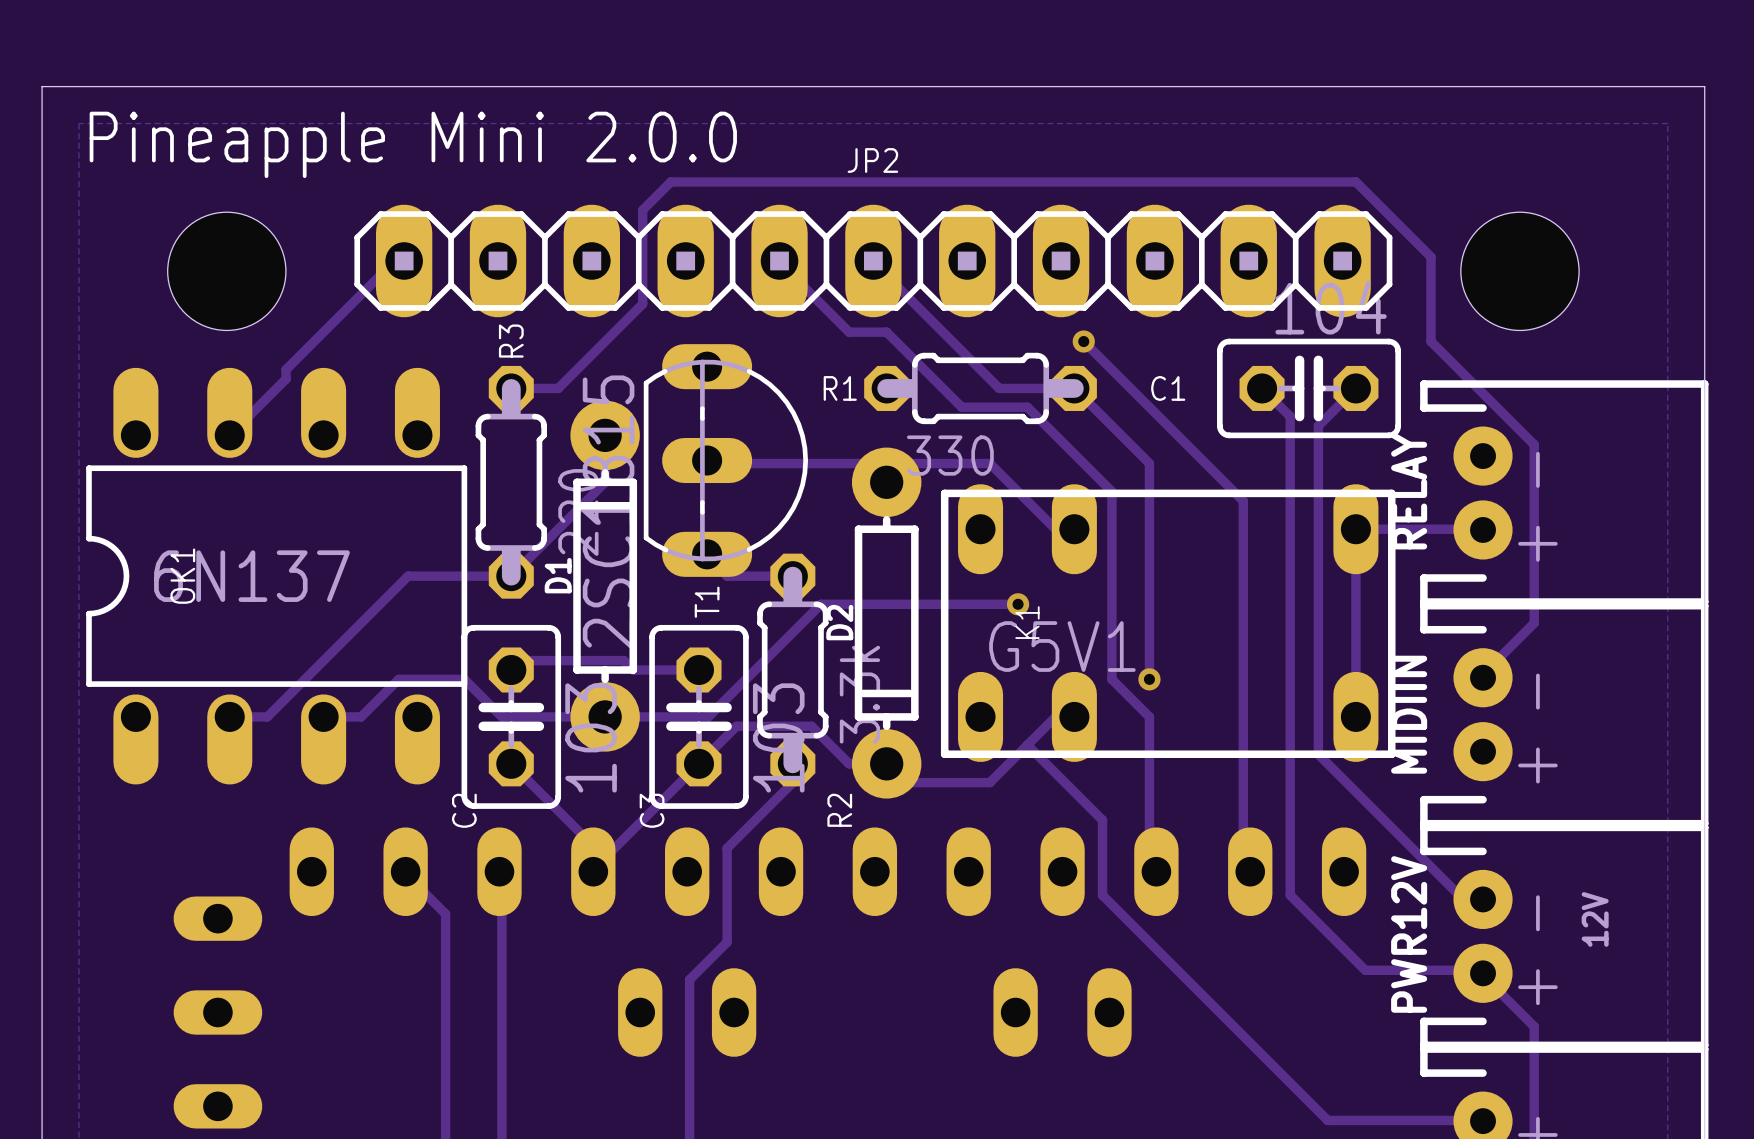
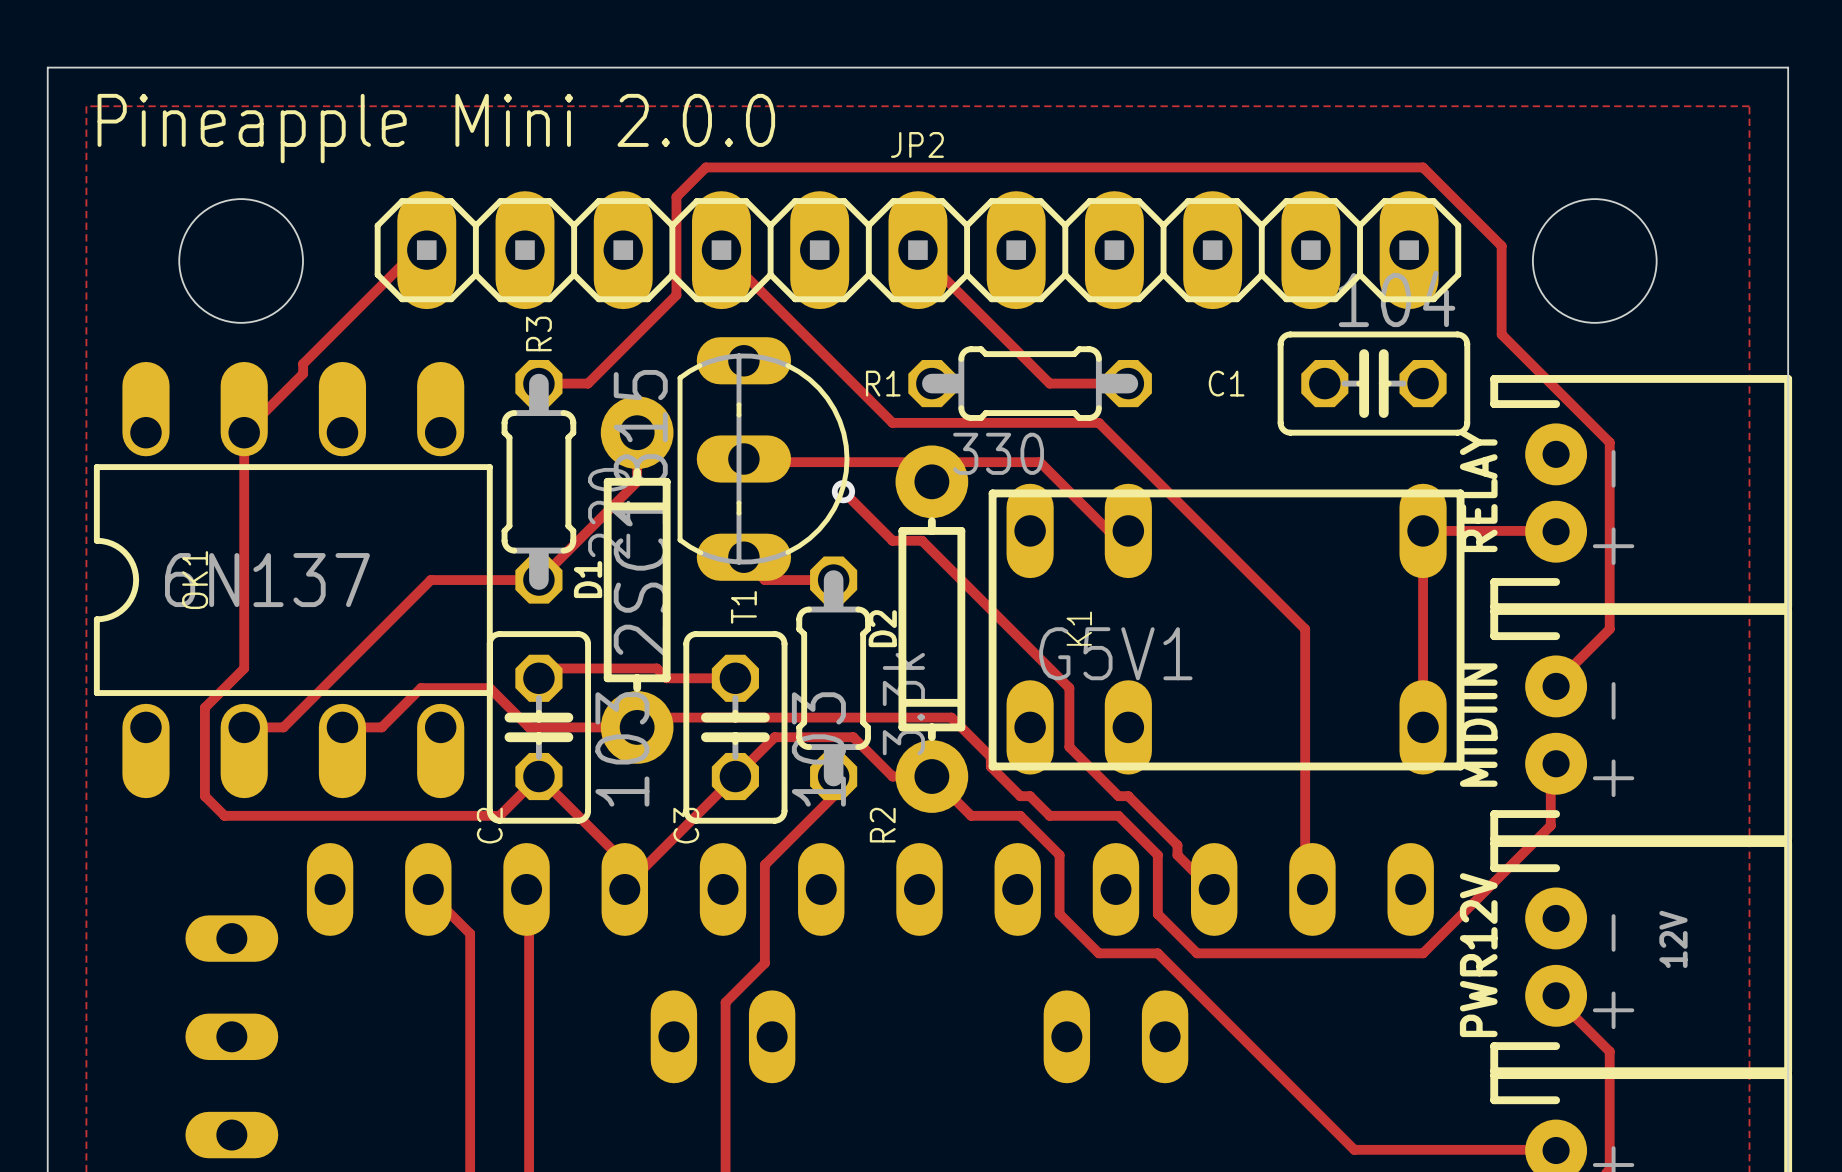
track: (779, 260) (849, 332) (886, 332) (961, 407) (1027, 407) (1046, 425) -> (721, 250) (892, 422) (1098, 422)
track: (1083, 341) (1243, 501) (1243, 623) -> (1167, 491) (1305, 629)
via: (1083, 341) -> none
track: (1074, 388) (1149, 463) (1149, 679) -> none
track: (1262, 388) (1290, 416) (1290, 895) (1365, 970) (1477, 970) (1483, 973) -> none
track: (1355, 388) (1318, 425) (1318, 754) (1459, 895) (1477, 895) (1483, 899) -> none
track: none -> (244, 432) (244, 668) (204, 707) (204, 796) (224, 815) (499, 815) (538, 776)
track: none -> (843, 491) (892, 540) (922, 540) (1069, 688) (1069, 747) (1079, 756)
via: none -> (843, 491)
track: (1111, 491) (1111, 679) (1149, 716) (1149, 867) (1156, 871) -> none
track: (1018, 604) (820, 604) (708, 716) (605, 716) -> (1020, 796) (990, 766) (990, 756) (951, 717) (646, 717) (637, 727)
via: (1018, 604) -> none
via: (1149, 679) -> none
track: (1074, 716) (1055, 716) (989, 782) (980, 782) -> (1157, 855) (1118, 815) (1049, 815) (1030, 796)
track: none -> (1556, 763) (1550, 766) (1550, 825) (1423, 953) (1197, 953)
track: (905, 782) (971, 782) -> none
track: (1064, 782) (1102, 820) (1102, 838) -> (1118, 796) (1128, 796) (1177, 845) (1177, 855) (1212, 888)
track: (1140, 932) (1327, 1120) -> (951, 796) (971, 815) (1020, 815) (1059, 855) (1059, 914) (1098, 953) (1157, 953) (1354, 1149) (1393, 1149)

